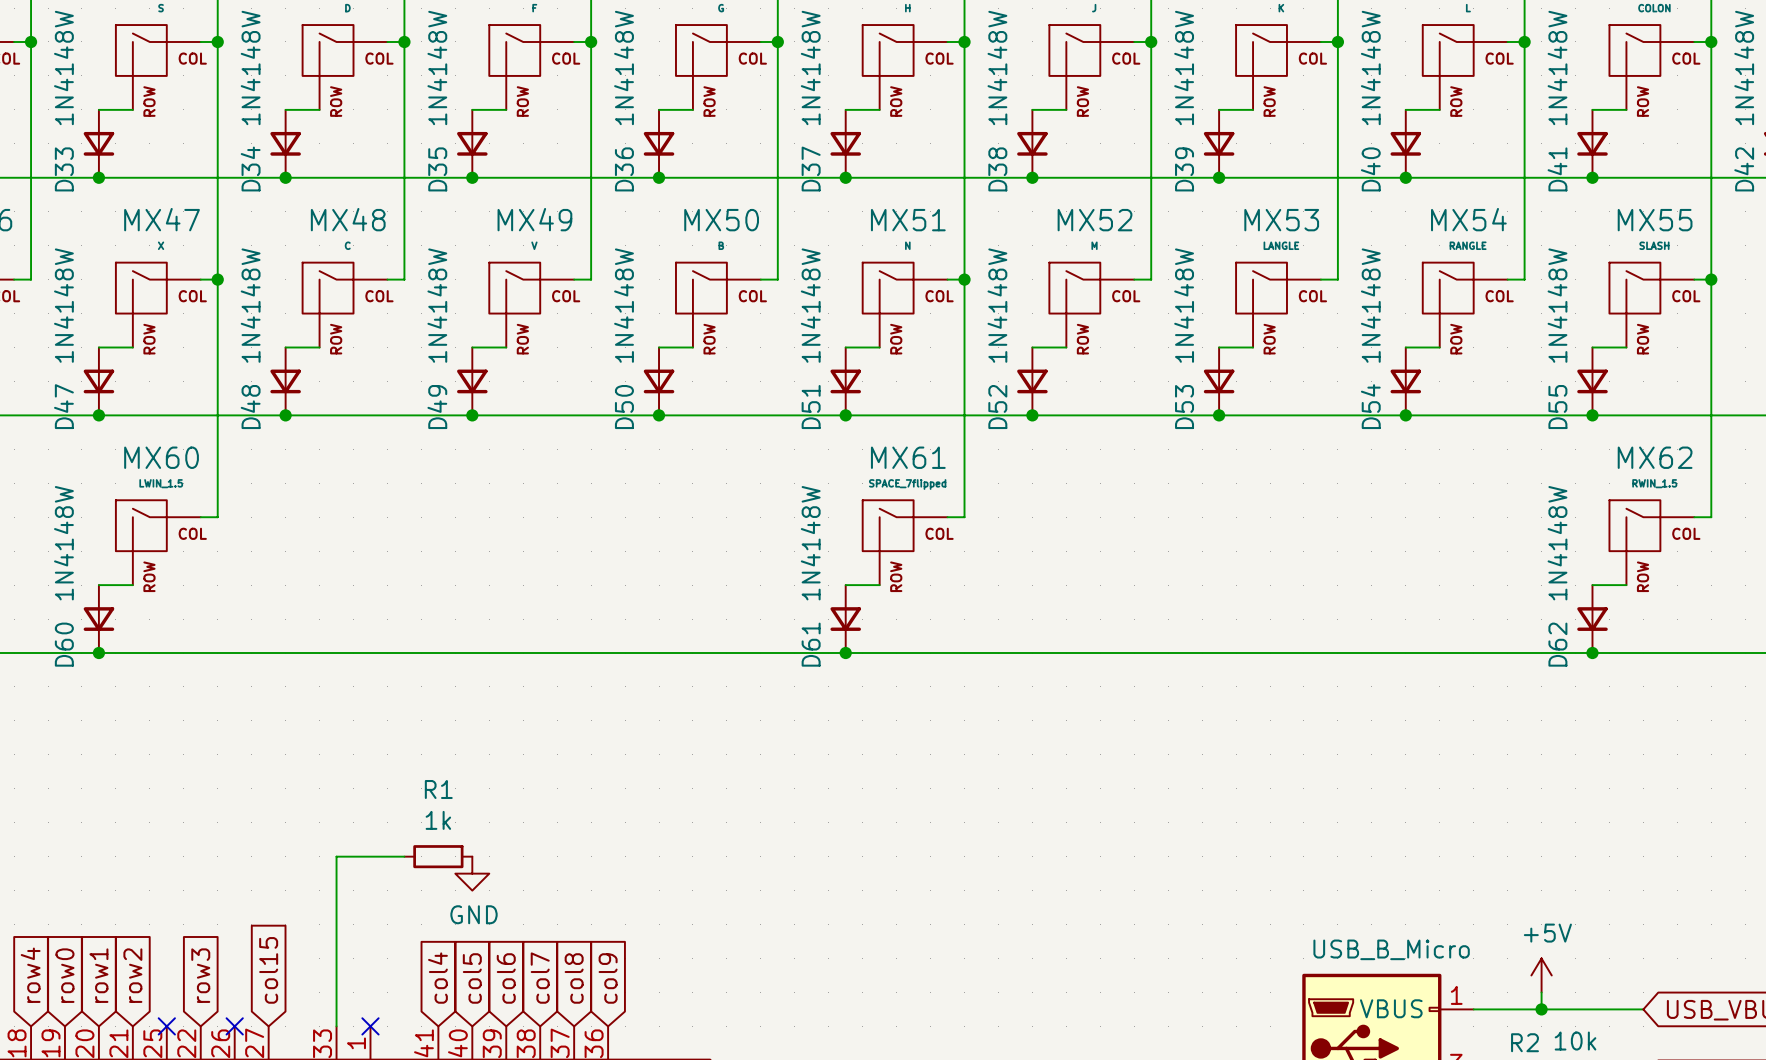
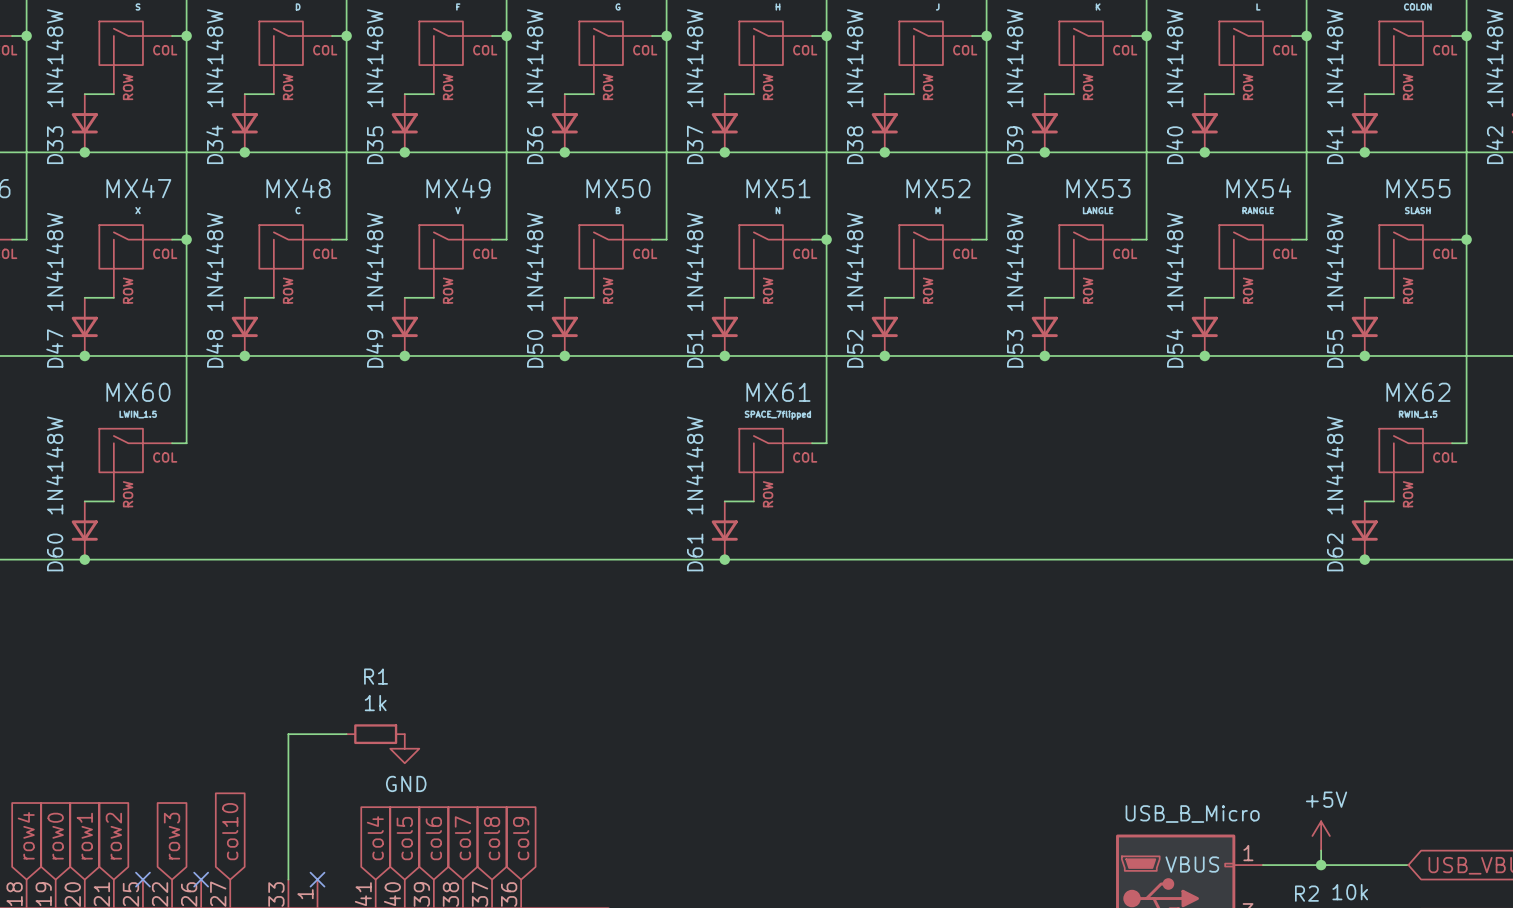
global label: col15 (268, 970) -> col10 (230, 831)

